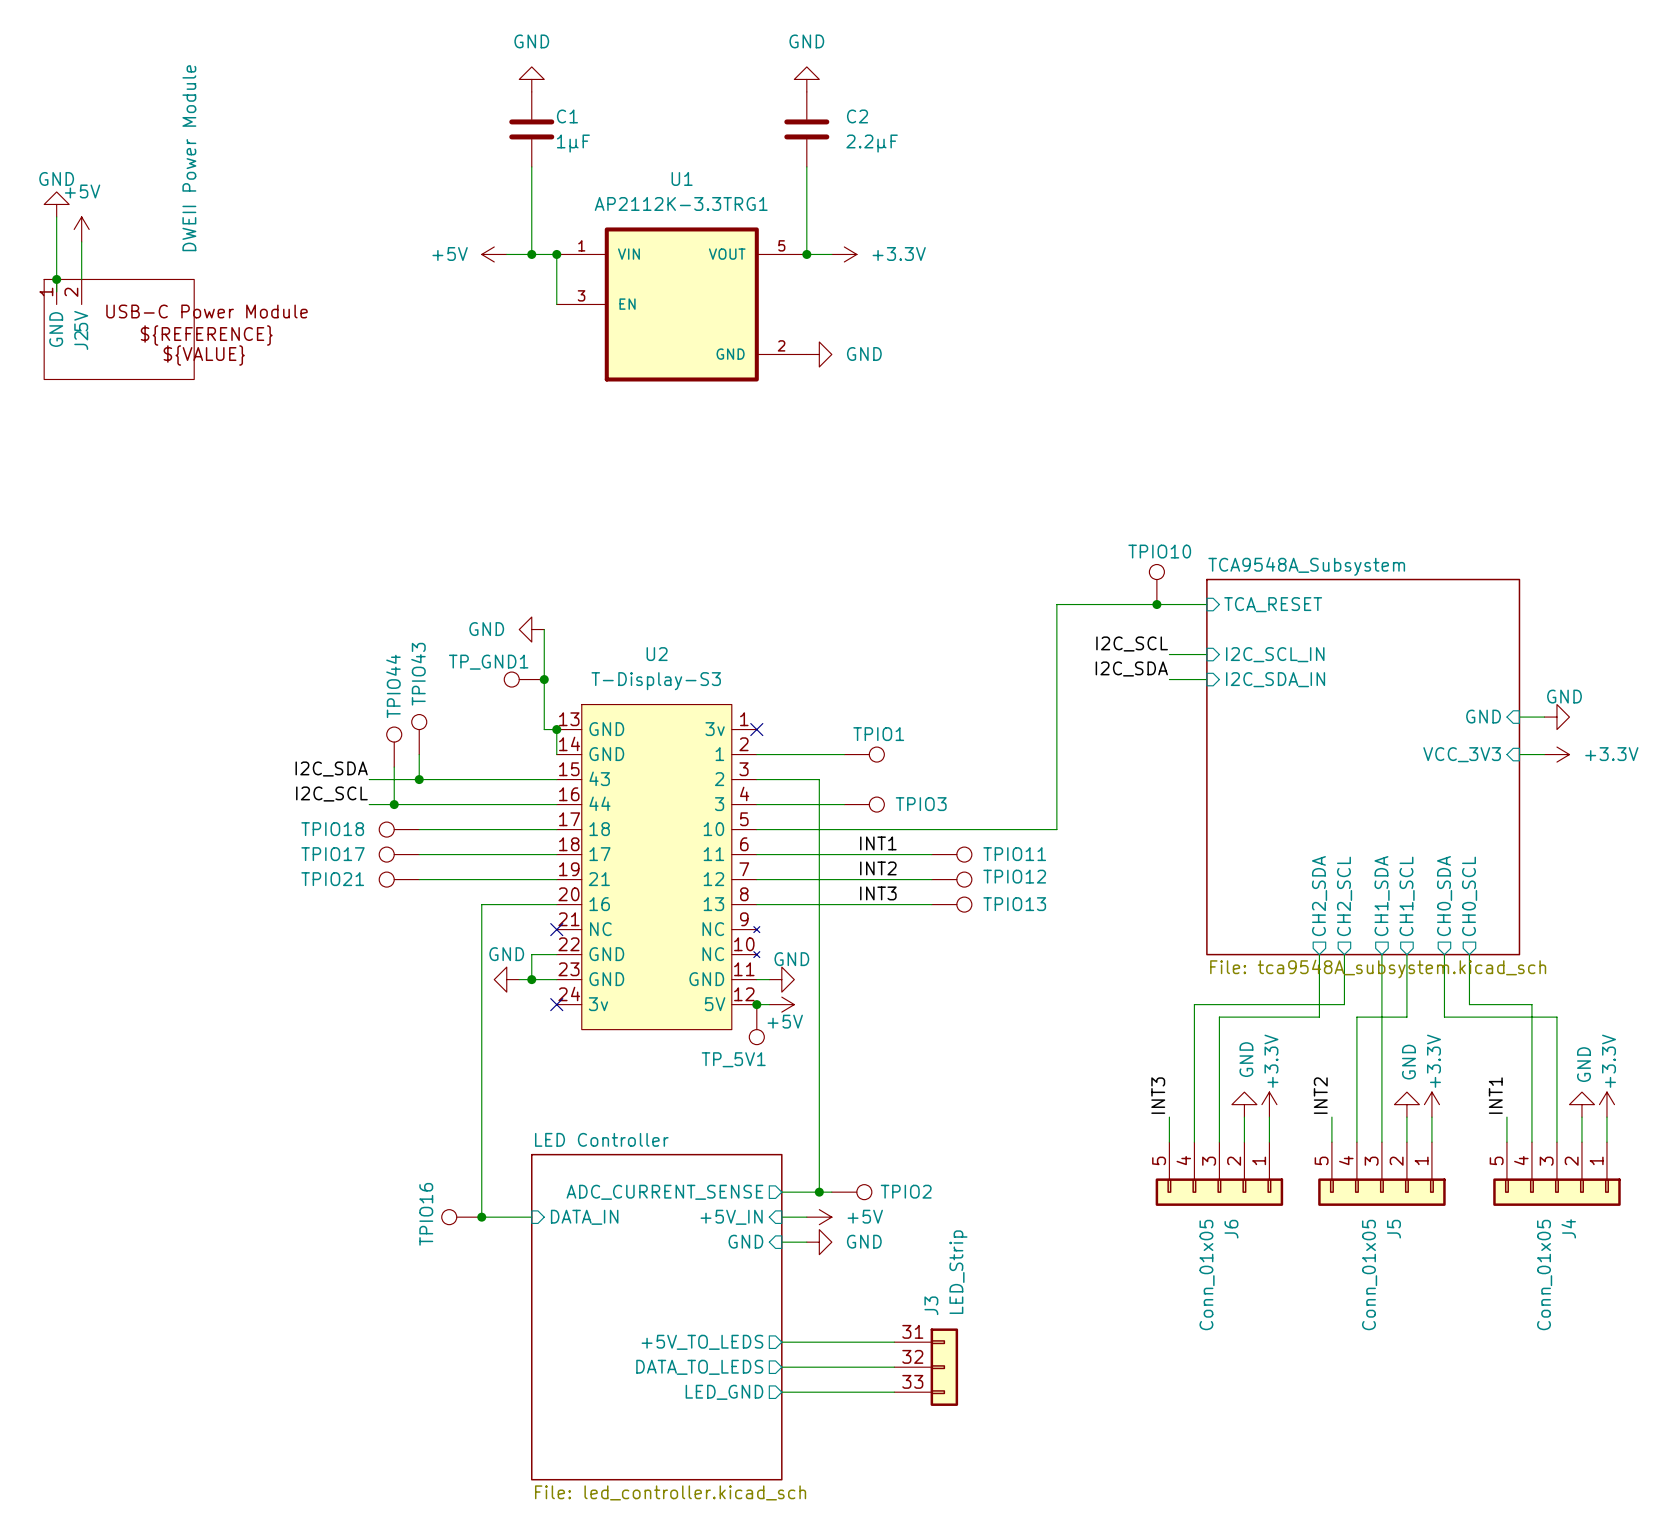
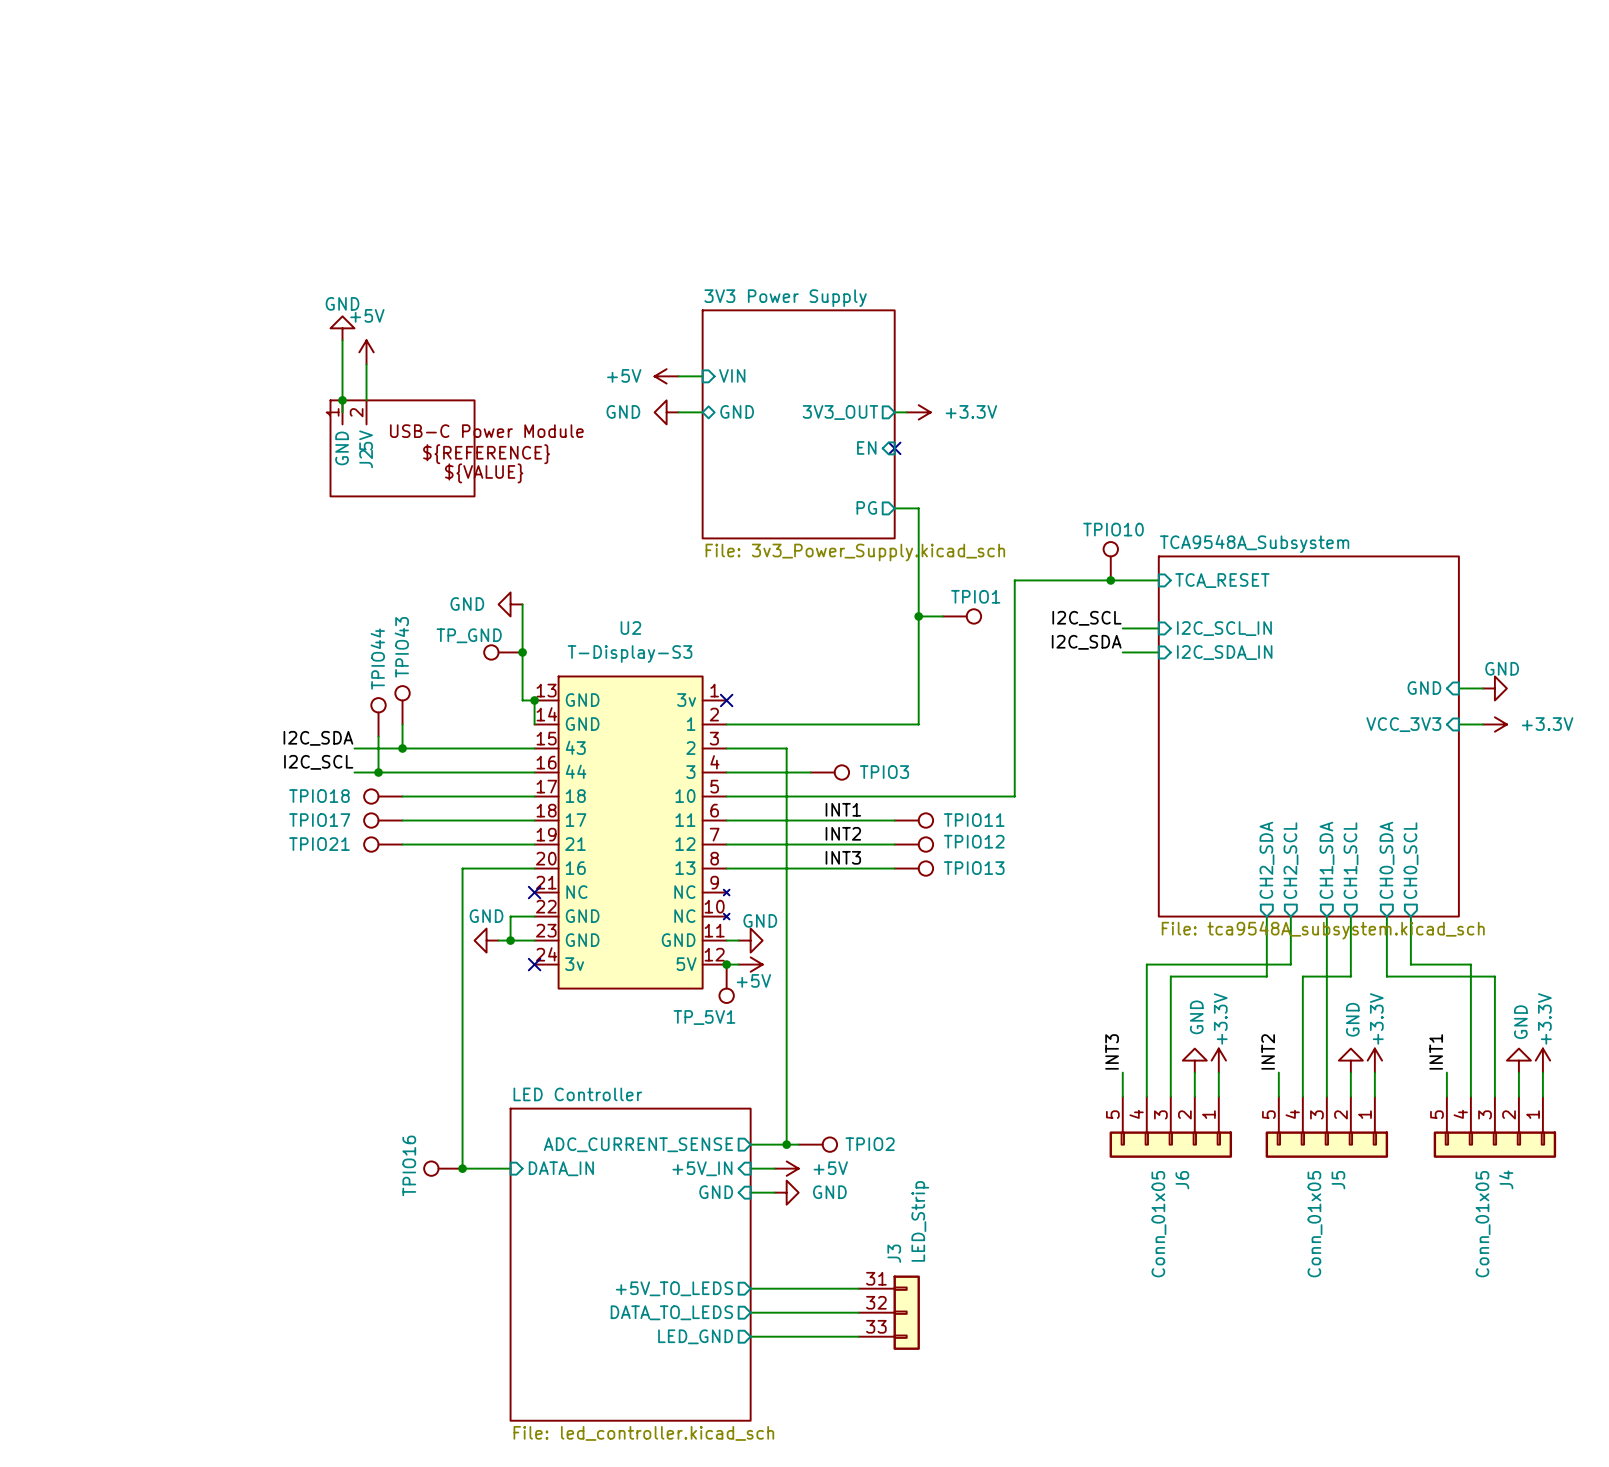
power symbol: GND (531, 79) -> none
power symbol: GND (806, 79) -> none
C1: 1µF (531, 129) -> none
C2: 2.2µF (806, 129) -> none
J2 value: DWEII Power Module (189, 158) -> none
wire: (531, 166) (531, 254) -> none
wire: (806, 166) (806, 254) (831, 254) -> none
power symbol: GND (56, 204) -> none
wire: (56, 216) (56, 291) -> none
power symbol: +5V (81, 229) -> none
wire: (81, 241) (81, 279) -> none
power symbol: +5V (494, 254) -> none
wire: (506, 254) (556, 254) (556, 304) -> none
junction: (531, 254) -> none
junction: (556, 254) -> none
junction: (806, 254) -> none
power symbol position: +3.3V (844, 254) -> +3.3V (918, 412)
junction: (56, 279) -> none
U1: AP2112K-3.3TRG1 (681, 304) -> none
J2 position: (119, 329) -> (402, 448)
power symbol: none -> GND (342, 328)
wire: none -> (342, 340) (342, 412)
power symbol rotation: 0° (819, 354) -> 180° (666, 412)
power symbol position: GND (819, 354) -> GND (666, 412)
power symbol: none -> +5V (366, 352)
wire: none -> (366, 364) (366, 400)
power symbol: none -> +5V (666, 376)
wire: none -> (678, 376) (702, 376)
sheet pin: none -> VIN (732, 375)
junction: none -> (342, 400)
wire: none -> (678, 412) (702, 412)
sheet pin: none -> GND (737, 411)
sheet pin: none -> 3V3_OUT (840, 412)
wire: none -> (894, 412) (906, 412)
sheet 3V3 Power Supply: none -> File: 3v3_Power_Supply.kicad_sch (798, 424)
sheet pin: none -> EN (866, 447)
no-connect mark: none -> (894, 448)
sheet pin: none -> PG (866, 507)
wire: none -> (894, 508) (918, 508) (918, 724) (810, 724)
wire: none -> (918, 616) (942, 616)
junction: none -> (918, 616)
TP_GND1 name: TP_GND1 (488, 662) -> TP_GND (469, 635)
TPIO1 position: (864, 754) -> (961, 616)

